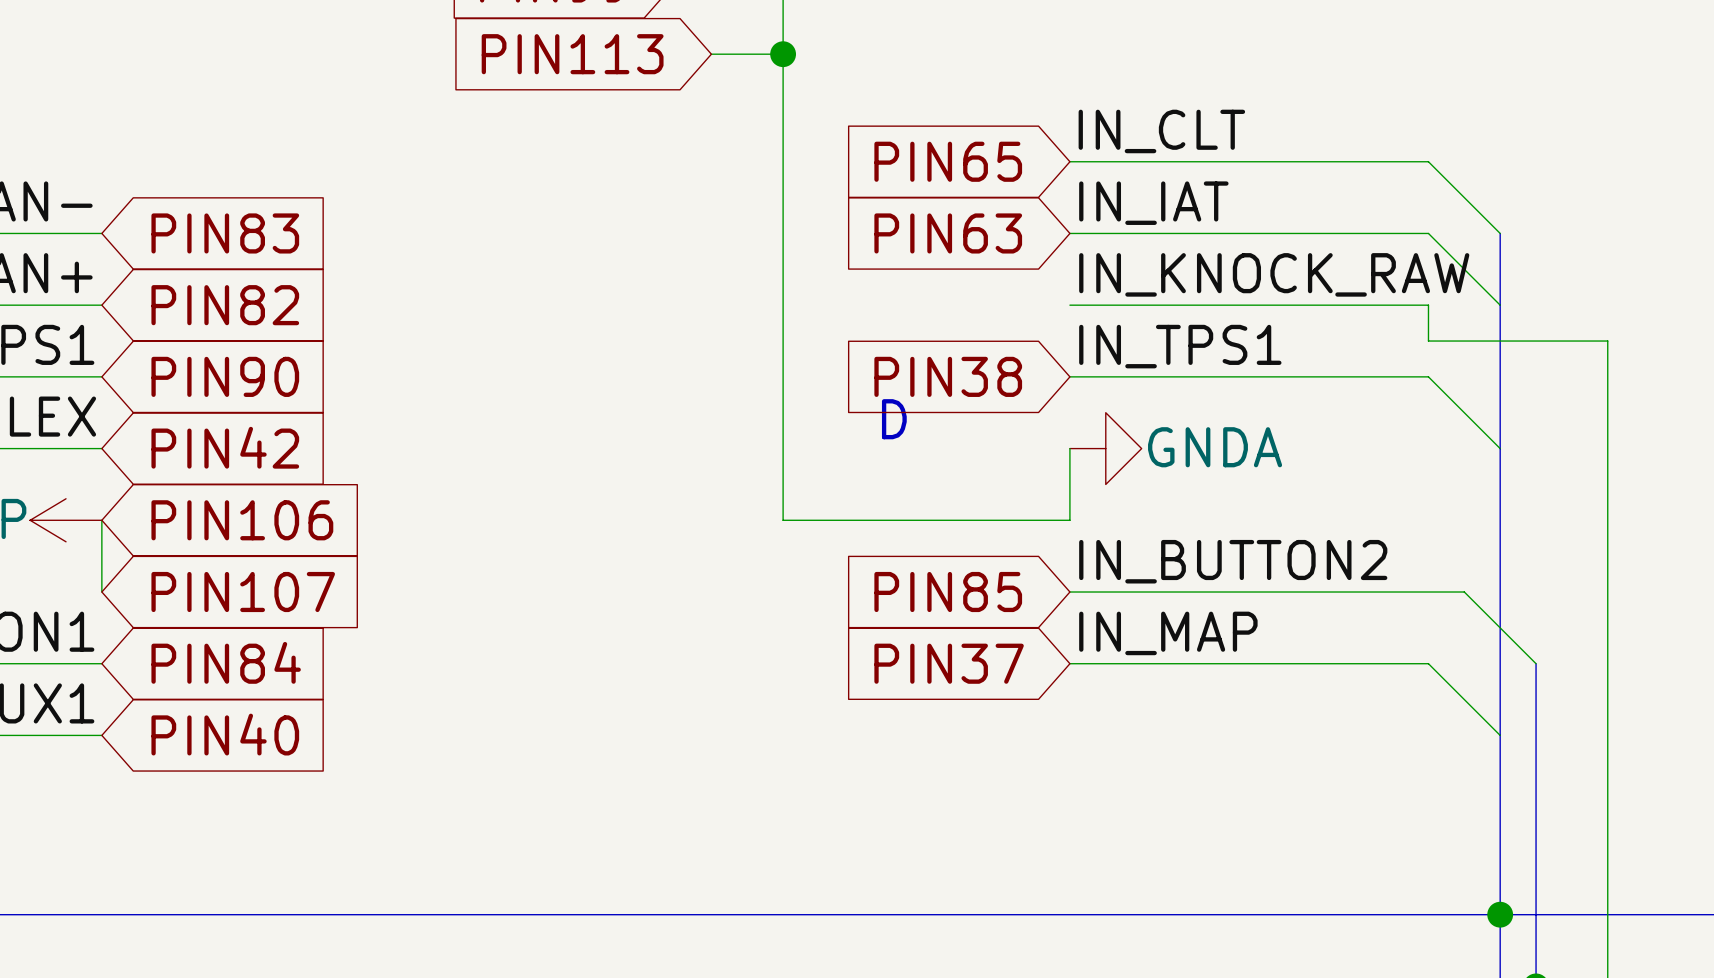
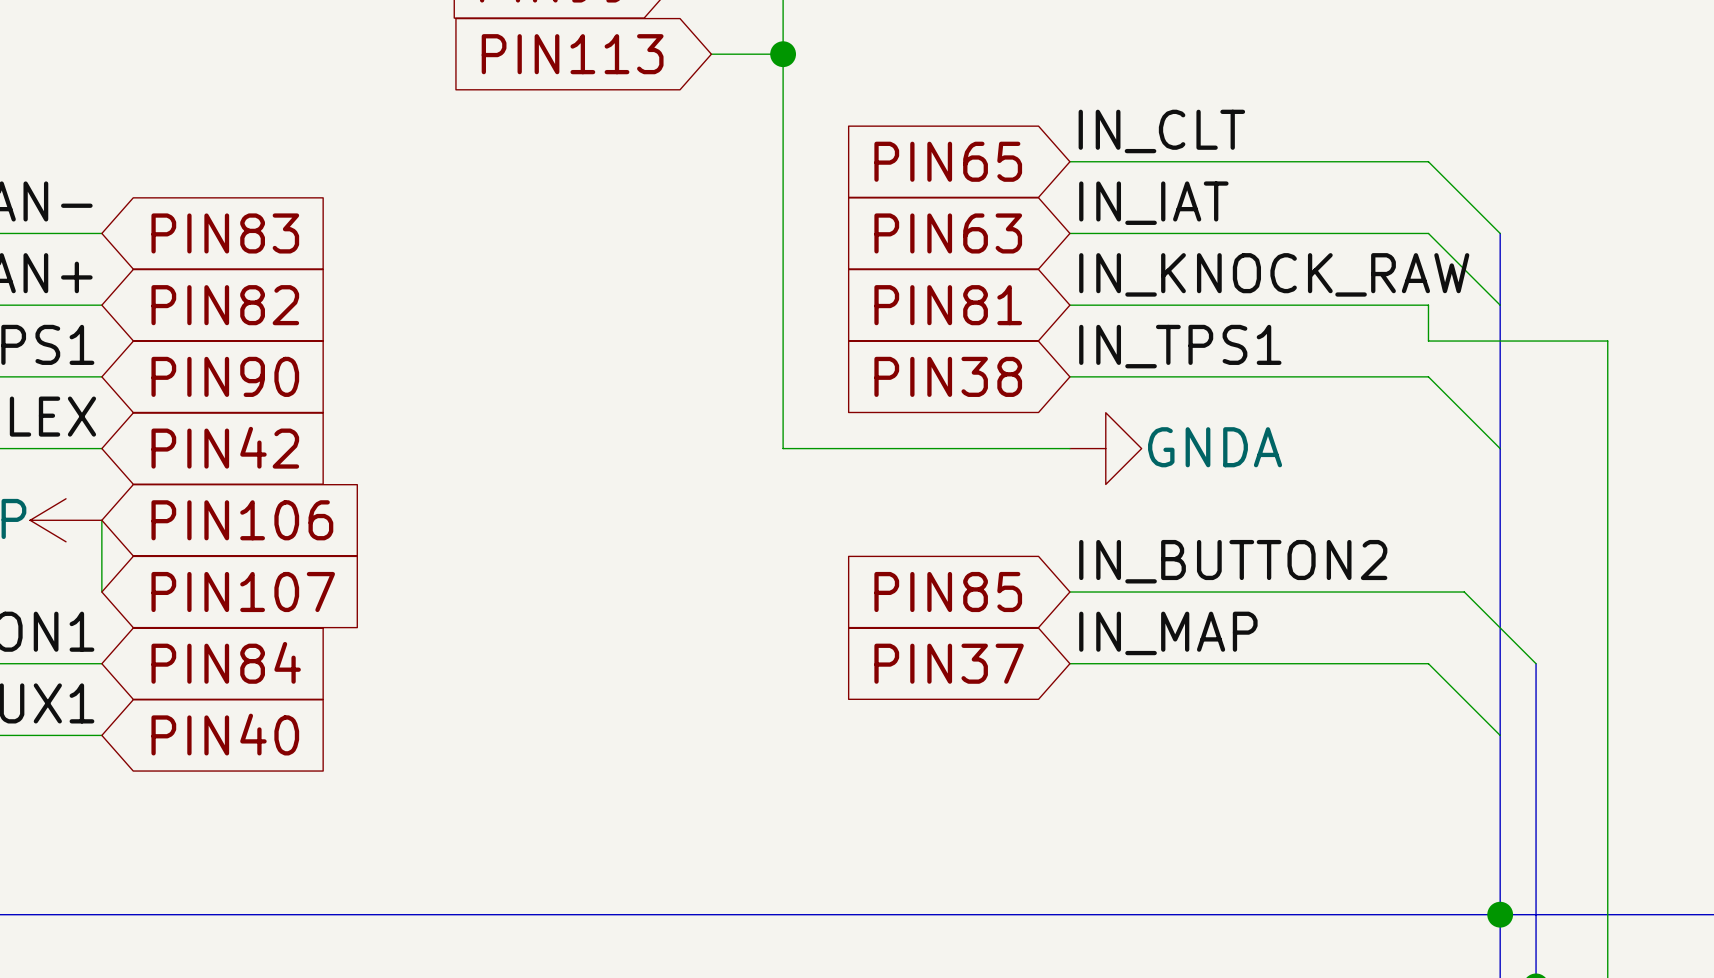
global label: none -> PIN81 (948, 305)
text: D (894, 419) -> none
wire: (783, 448) (783, 520) (1069, 520) (1069, 448) -> (783, 448) (1069, 448)

